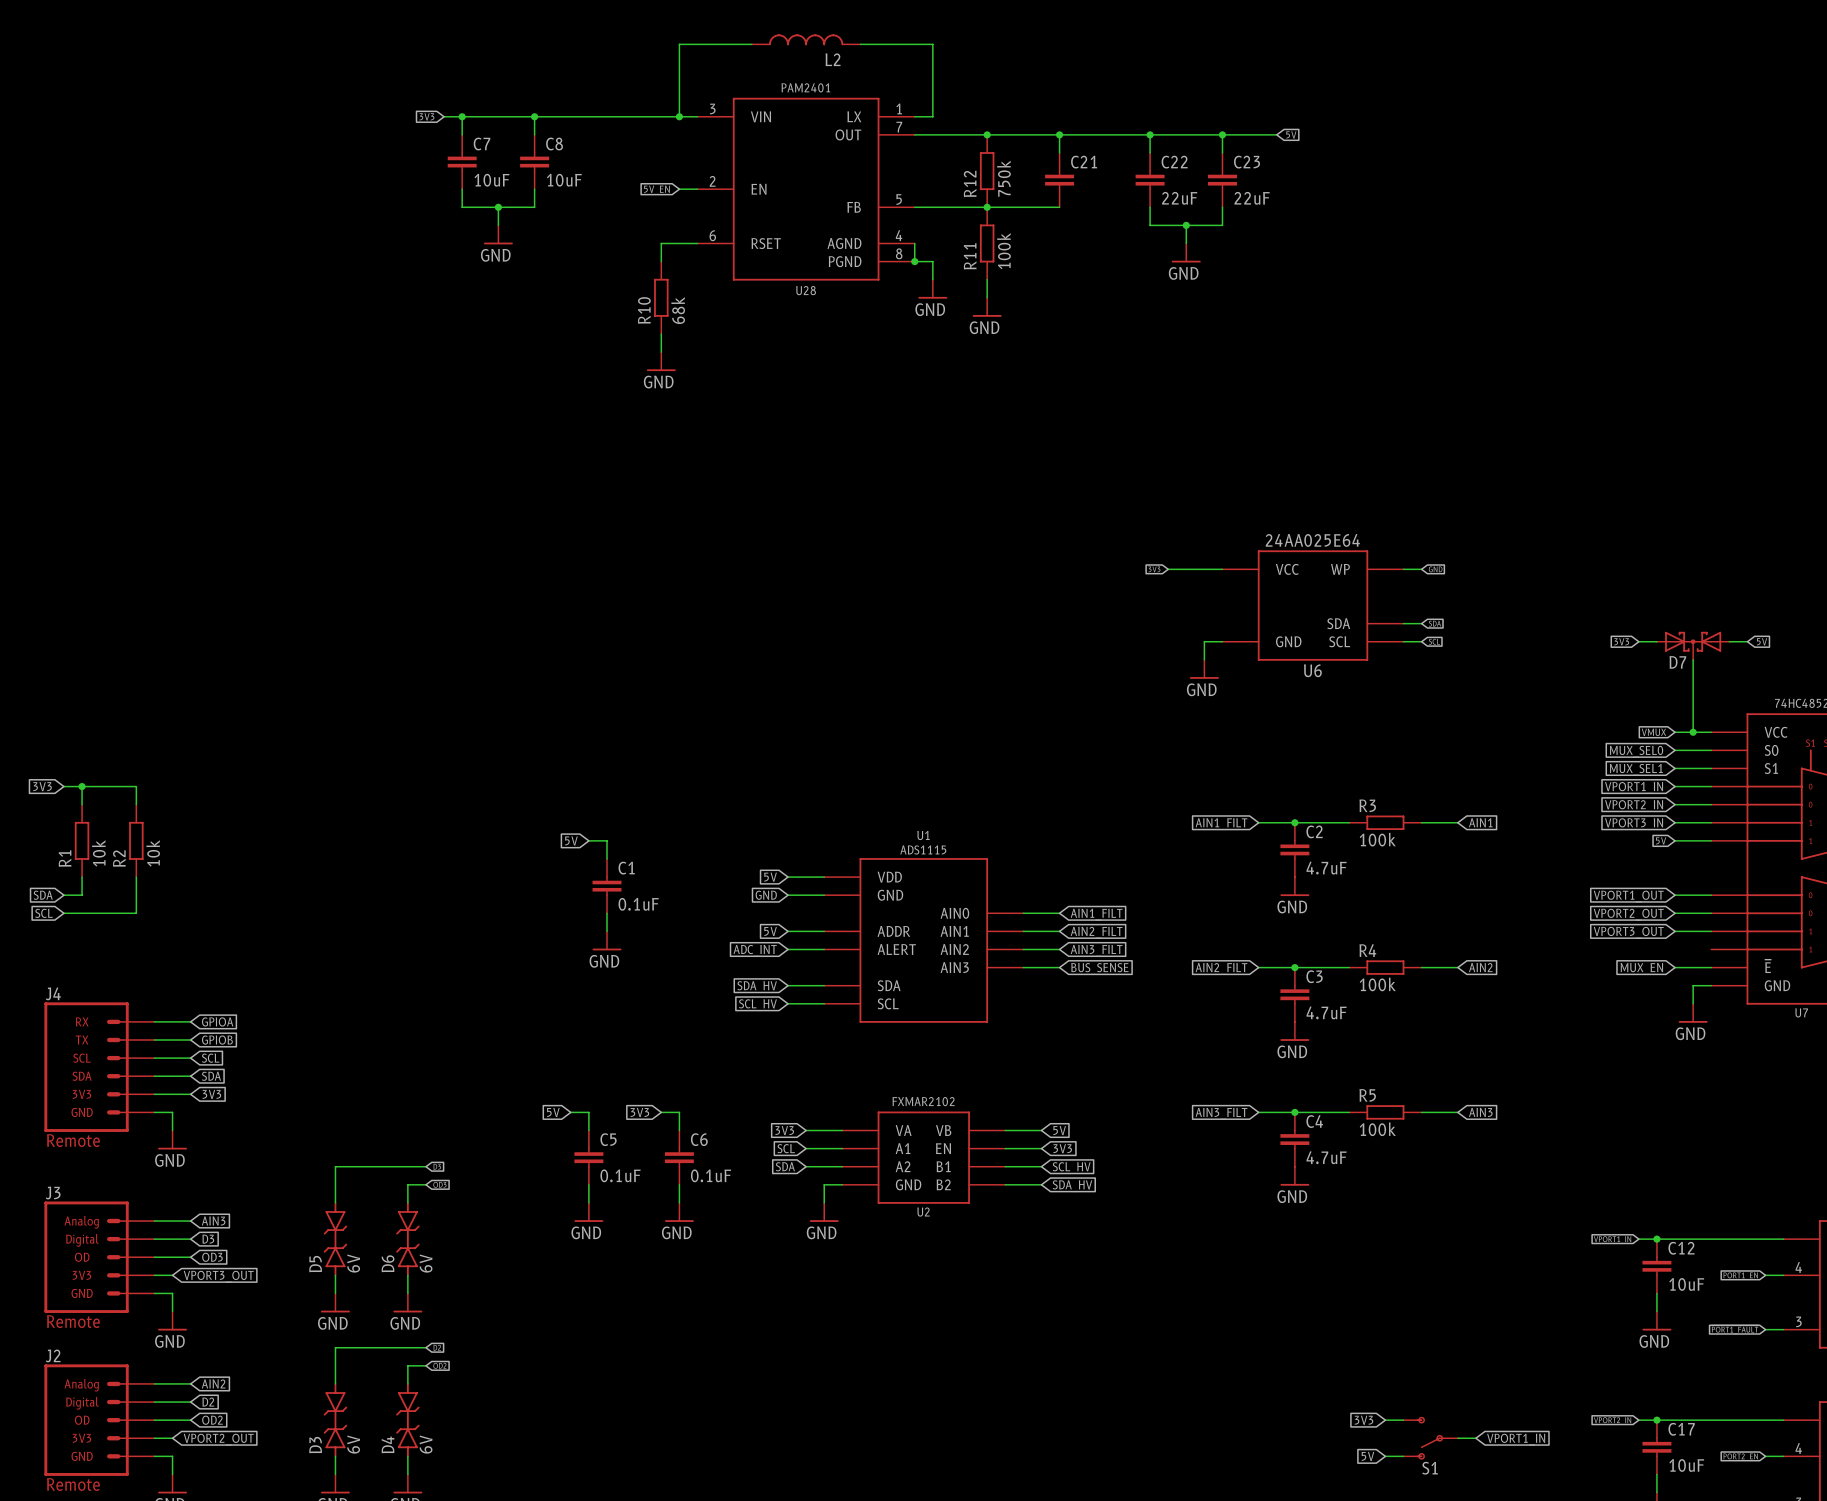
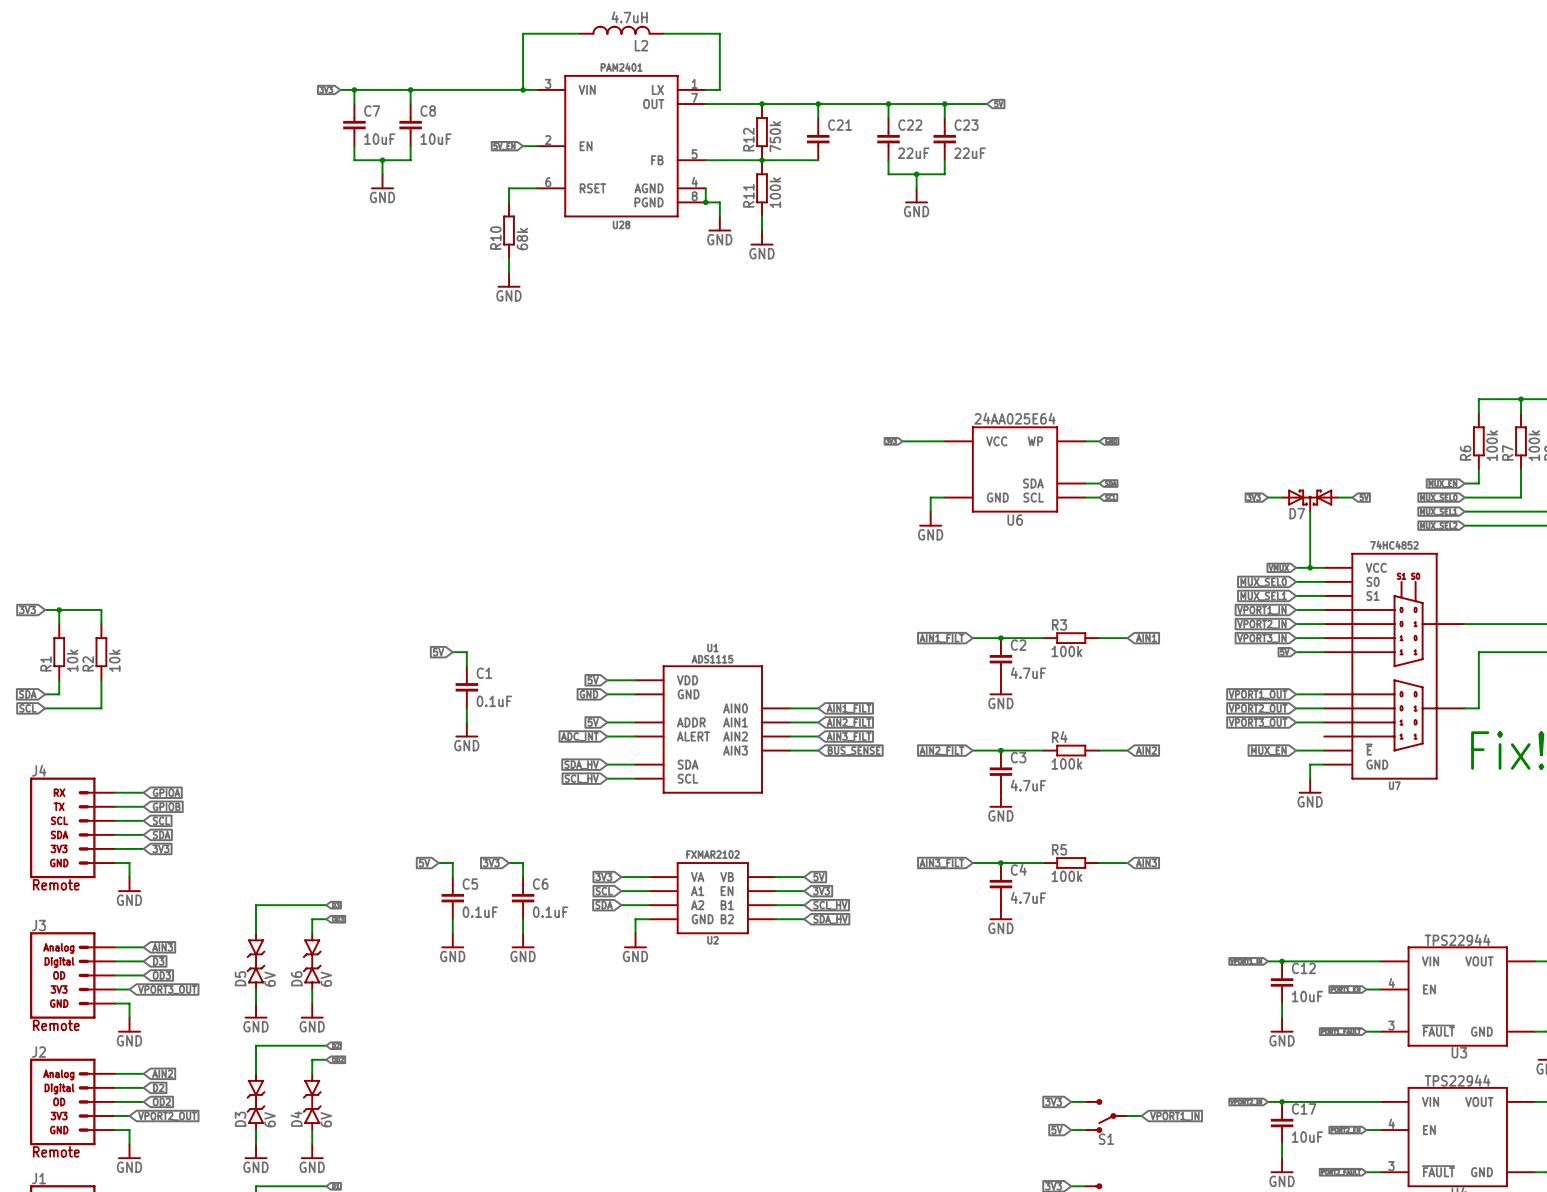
L2 value: none -> 4.7uH (629, 17)

